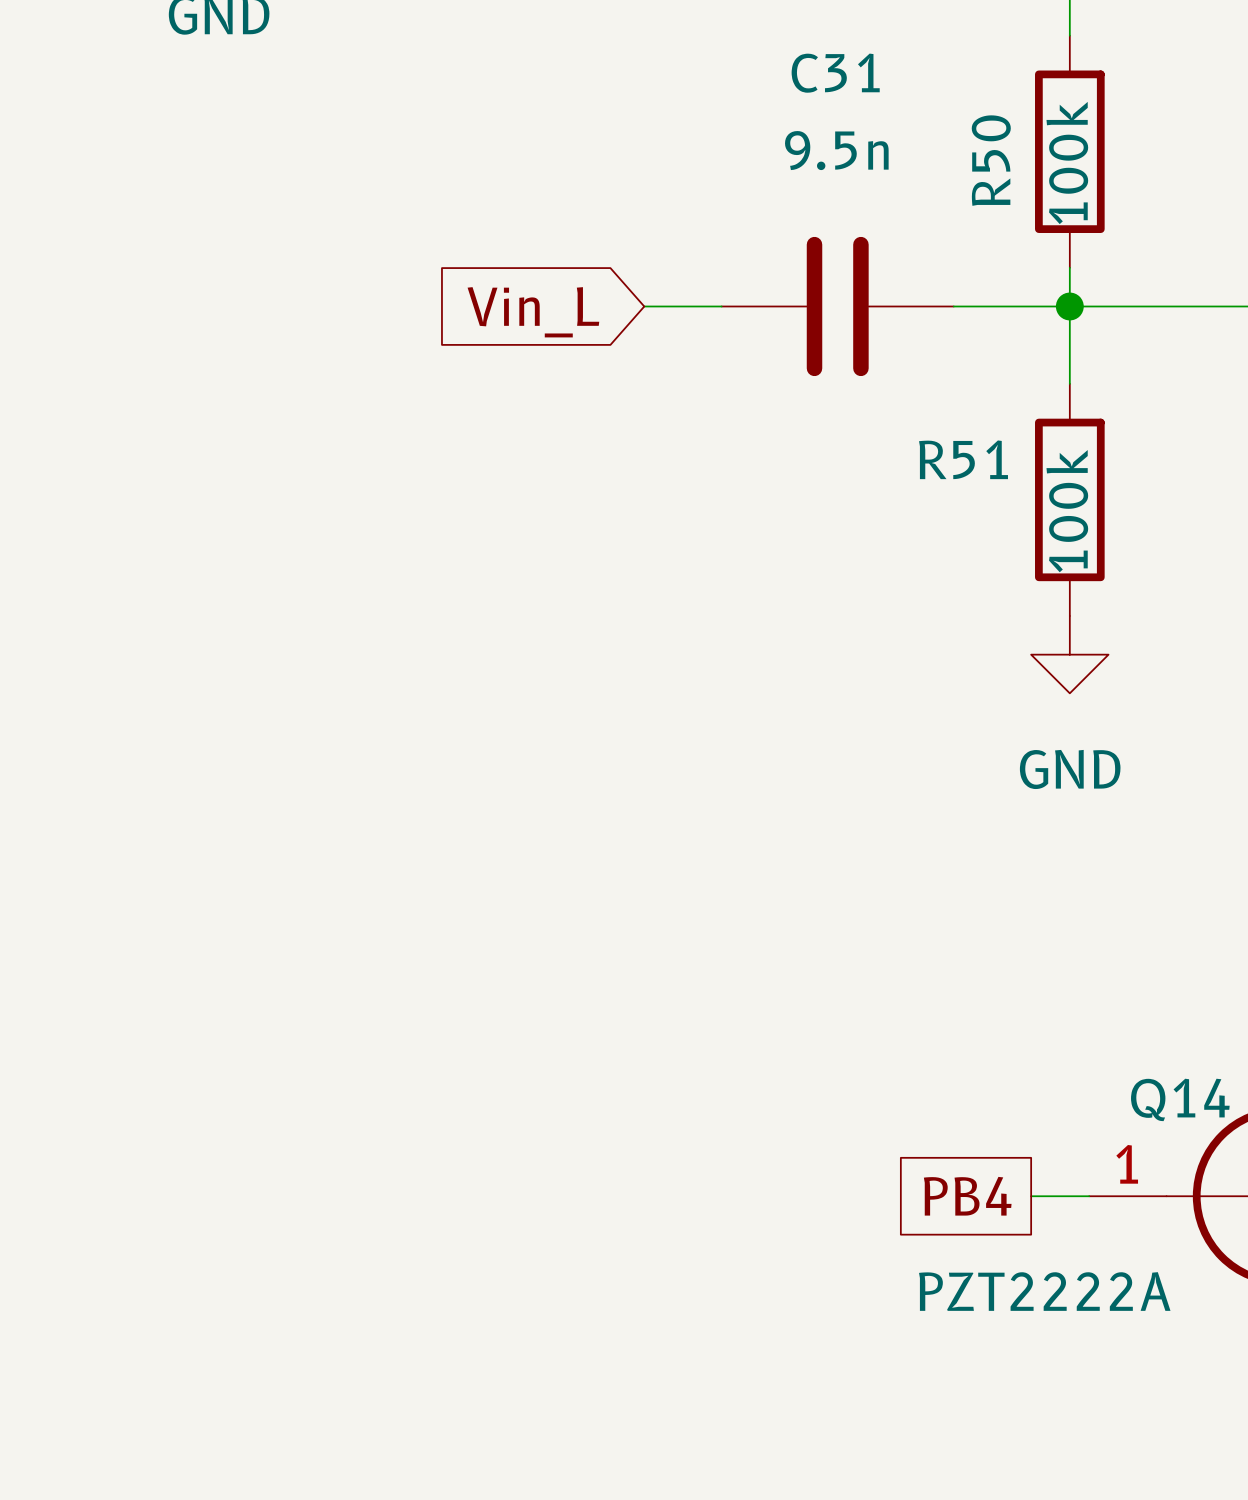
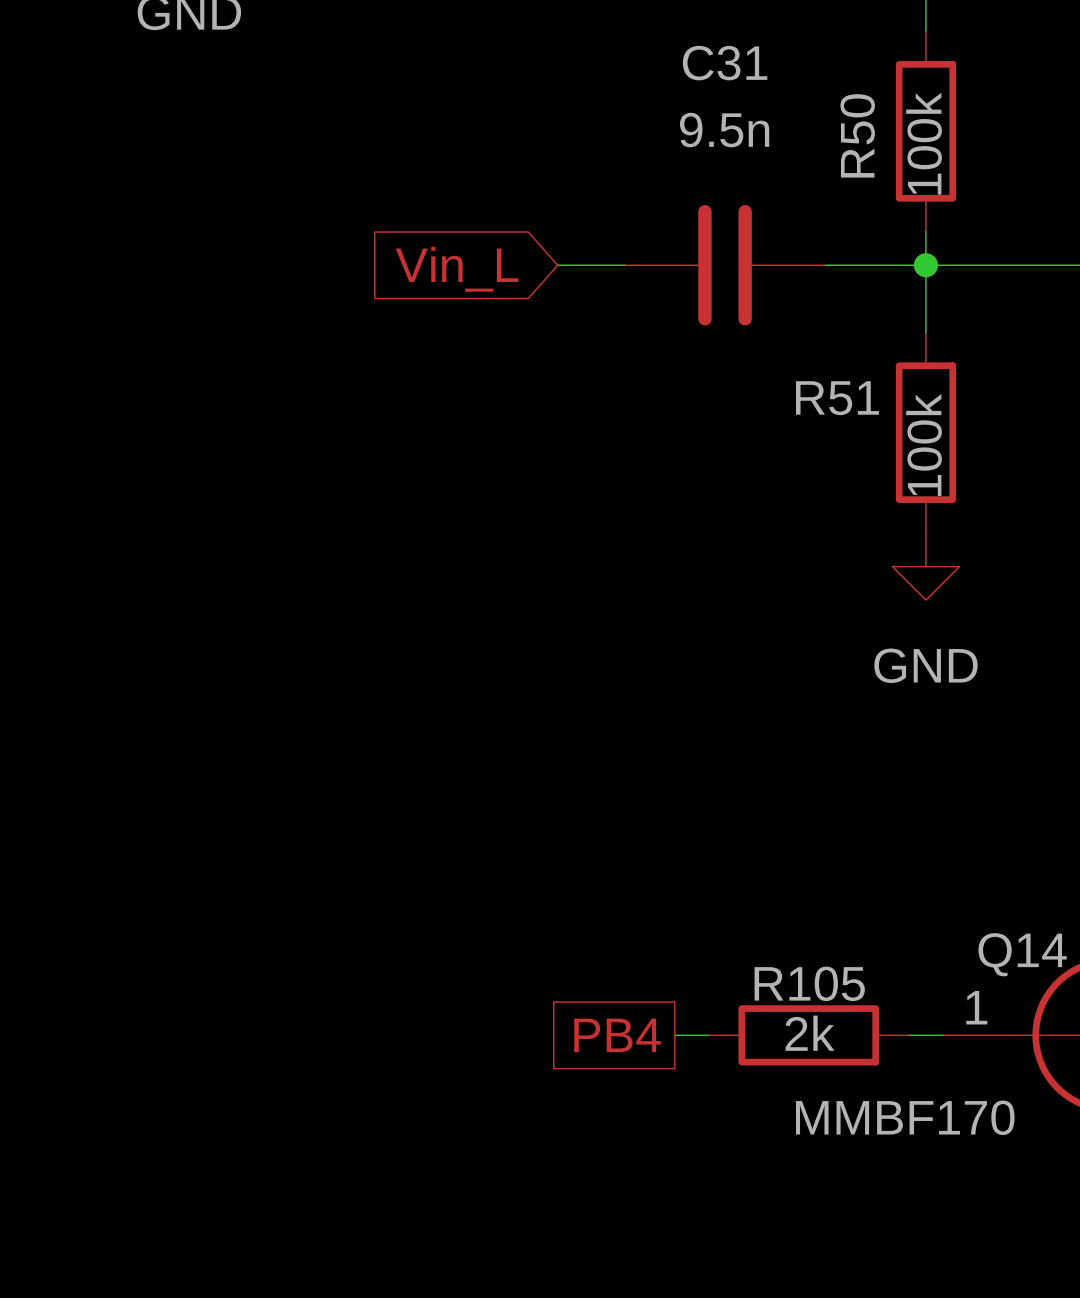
wire: none -> (674, 1035) (708, 1035)
R105: none -> 2k (808, 1035)
global label position: PB4 (967, 1196) -> PB4 (617, 1035)
Q14 value: PZT2222A (1044, 1291) -> MMBF170 (905, 1117)

